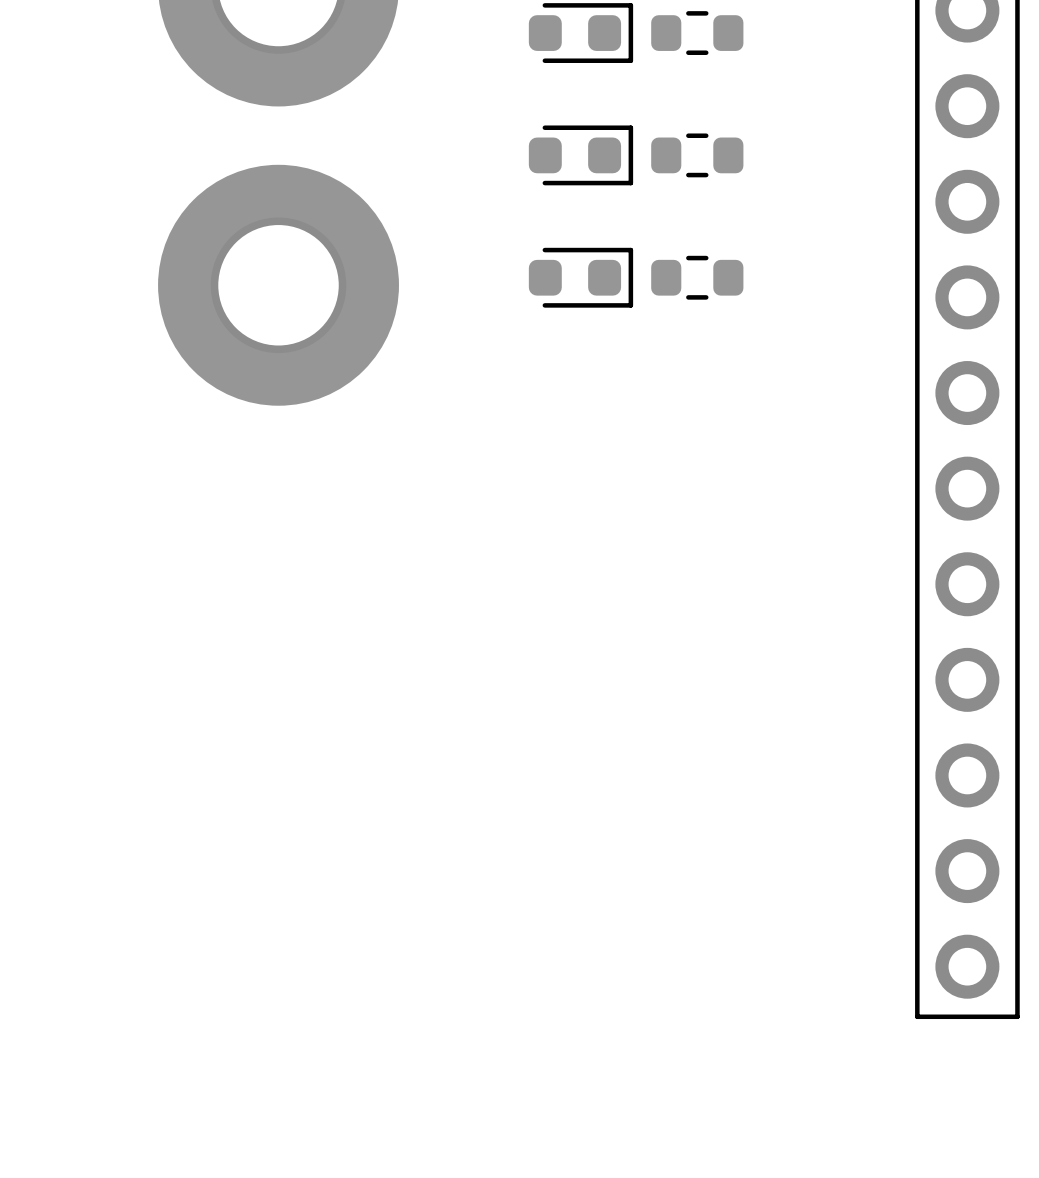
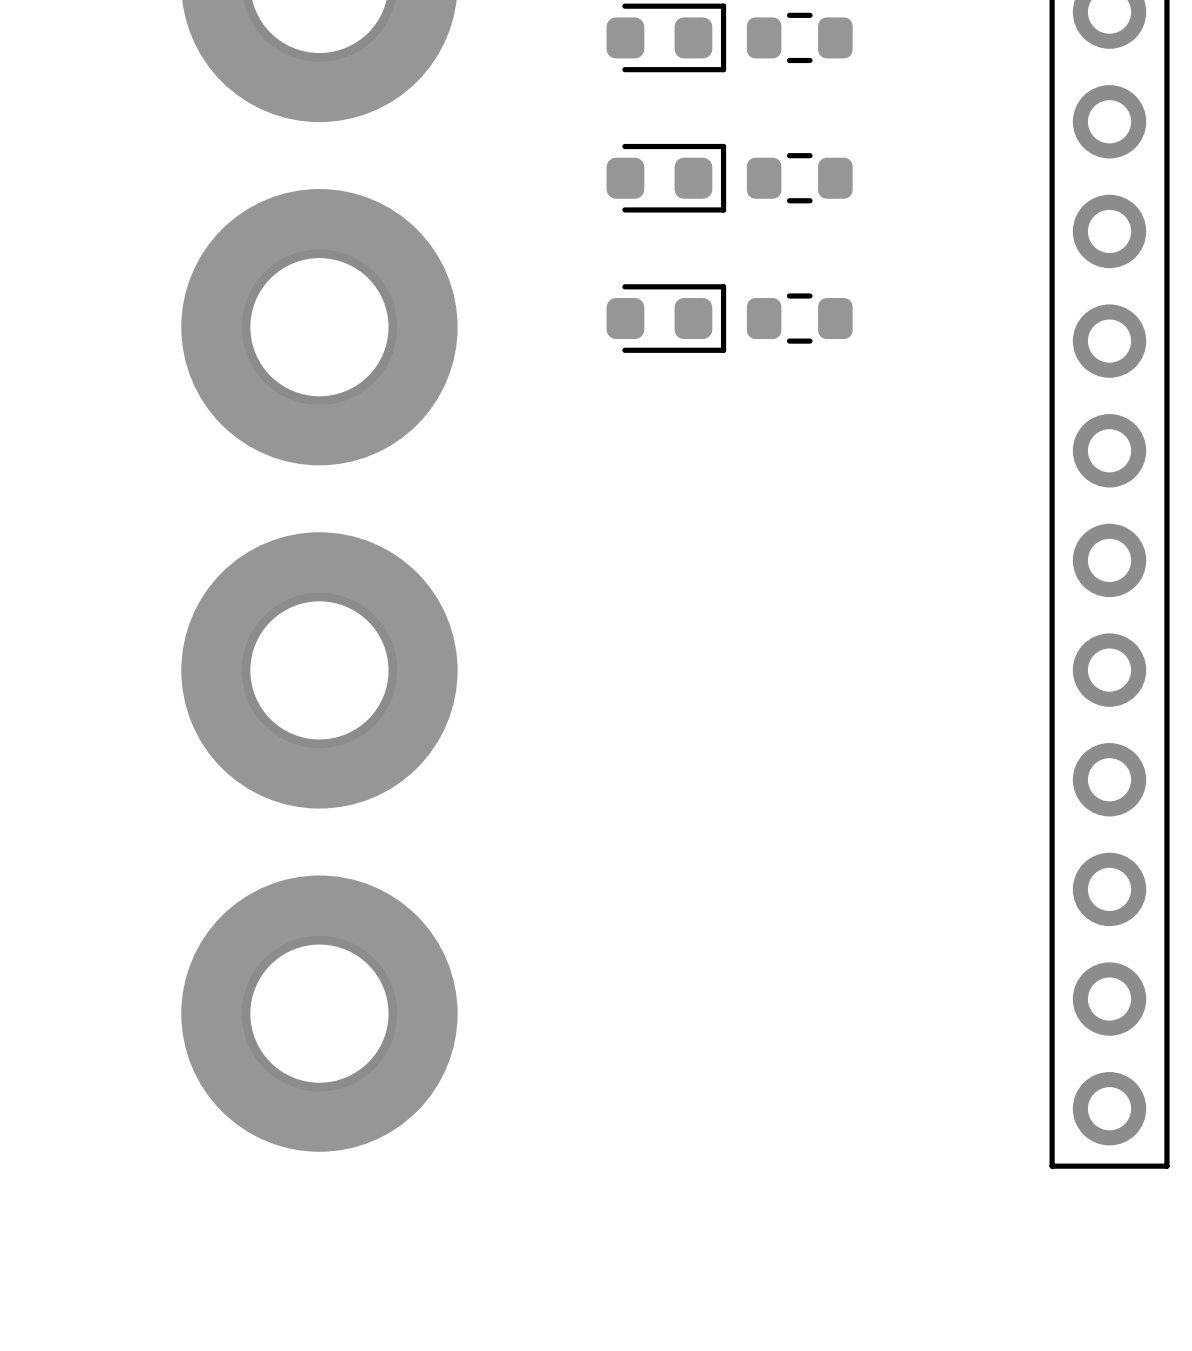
part: none -> (319, 670)
part: none -> (319, 1013)

